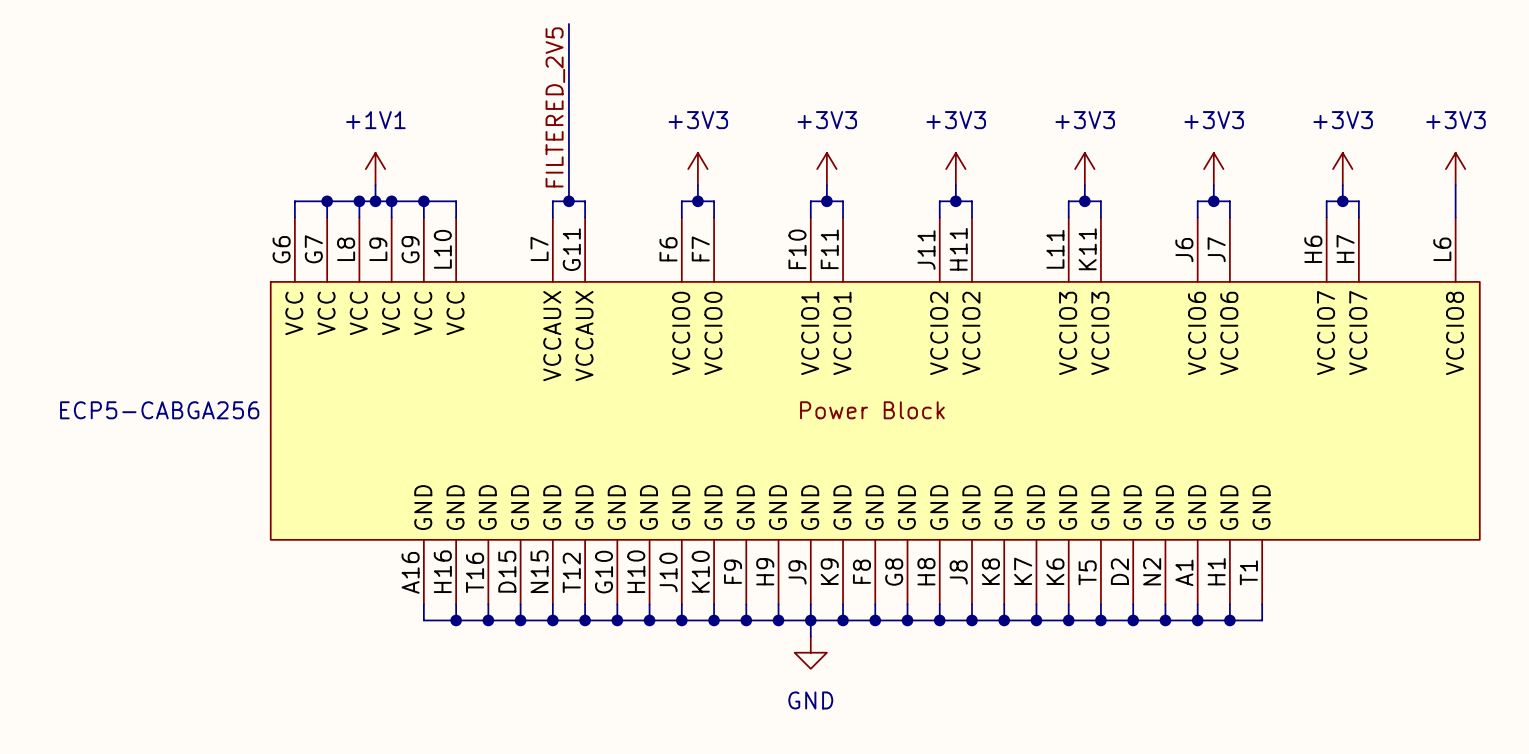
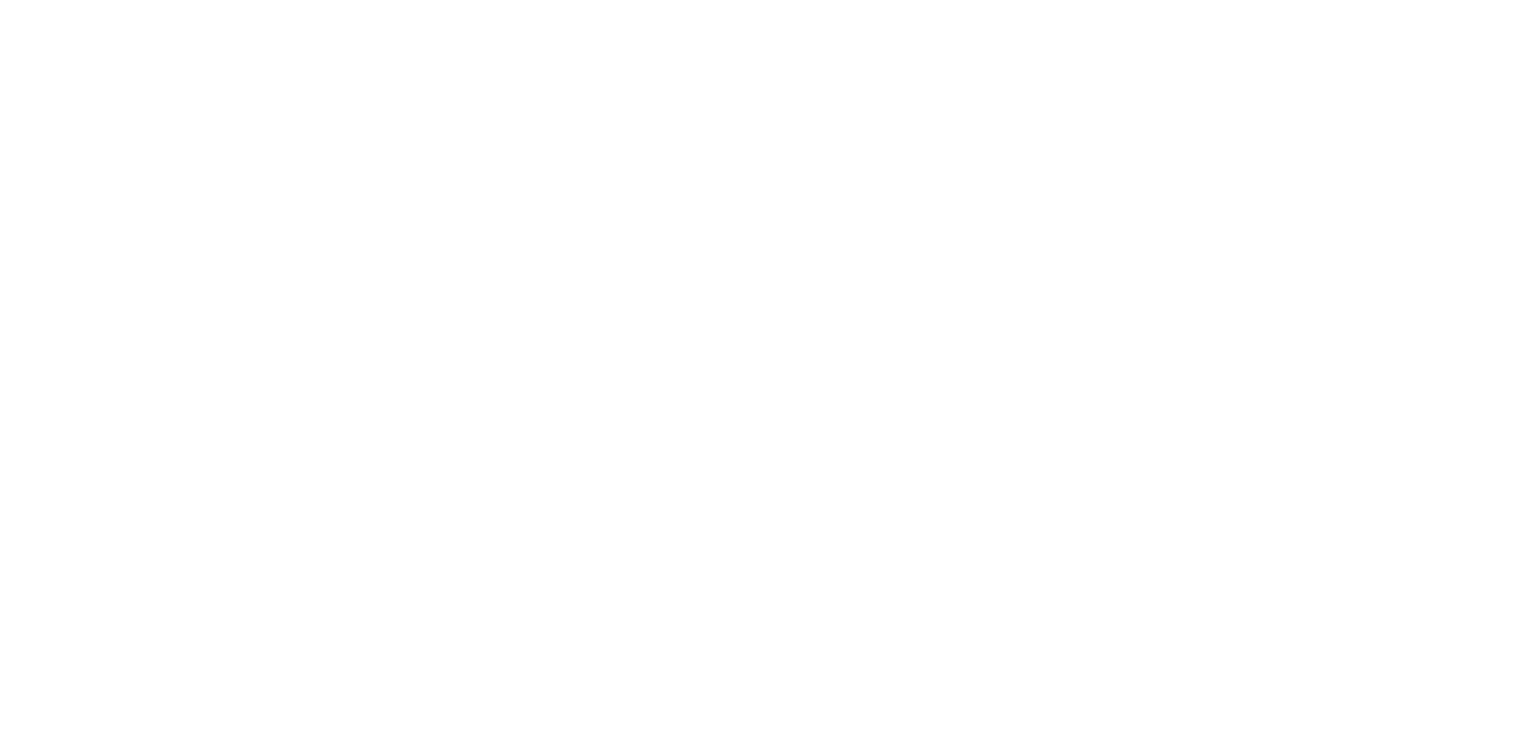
wire: (568, 23) (568, 201) -> none
label: FILTERED_2V5 (555, 107) -> none
power symbol: +1V1 (375, 169) -> none
power symbol: +3V3 (697, 169) -> none
power symbol: +3V3 (826, 169) -> none
power symbol: +3V3 (955, 169) -> none
power symbol: +3V3 (1084, 169) -> none
power symbol: +3V3 (1213, 169) -> none
power symbol: +3V3 (1342, 169) -> none
power symbol: +3V3 (1455, 169) -> none
wire: (375, 185) (375, 201) -> none
wire: (697, 185) (697, 201) -> none
wire: (826, 185) (826, 201) -> none
wire: (955, 185) (955, 201) -> none
wire: (1084, 185) (1084, 201) -> none
wire: (1213, 185) (1213, 201) -> none
wire: (1342, 185) (1342, 201) -> none
wire: (1455, 185) (1455, 217) -> none
wire: (327, 201) (327, 217) -> none
junction: (327, 201) -> none
wire: (359, 201) (359, 217) -> none
junction: (359, 201) -> none
junction: (375, 201) -> none
wire: (391, 201) (391, 217) -> none
junction: (391, 201) -> none
wire: (423, 201) (423, 217) -> none
junction: (423, 201) -> none
junction: (568, 201) -> none
junction: (697, 201) -> none
junction: (826, 201) -> none
junction: (955, 201) -> none
junction: (1084, 201) -> none
junction: (1213, 201) -> none
junction: (1342, 201) -> none
wire: (294, 217) (294, 201) (456, 201) (456, 217) -> none
wire: (552, 217) (552, 201) (585, 201) (585, 217) -> none
wire: (681, 217) (681, 201) (714, 201) (714, 217) -> none
wire: (810, 217) (810, 201) (843, 201) (843, 217) -> none
wire: (939, 217) (939, 201) (971, 201) (971, 217) -> none
wire: (1068, 217) (1068, 201) (1100, 201) (1100, 217) -> none
wire: (1197, 217) (1197, 201) (1229, 201) (1229, 217) -> none
wire: (1326, 217) (1326, 201) (1358, 201) (1358, 217) -> none
part: ECP5-CABGA256 (875, 410) -> none
wire: (423, 604) (423, 620) (1262, 620) (1262, 604) -> none
wire: (456, 604) (456, 620) -> none
wire: (488, 604) (488, 620) -> none
wire: (520, 604) (520, 620) -> none
wire: (552, 604) (552, 620) -> none
wire: (585, 604) (585, 620) -> none
wire: (617, 604) (617, 620) -> none
wire: (649, 604) (649, 620) -> none
wire: (681, 604) (681, 620) -> none
wire: (714, 604) (714, 620) -> none
wire: (746, 604) (746, 620) -> none
wire: (778, 604) (778, 620) -> none
wire: (810, 604) (810, 636) -> none
wire: (843, 604) (843, 620) -> none
wire: (875, 604) (875, 620) -> none
wire: (907, 604) (907, 620) -> none
wire: (939, 604) (939, 620) -> none
wire: (971, 604) (971, 620) -> none
wire: (1004, 604) (1004, 620) -> none
wire: (1036, 604) (1036, 620) -> none
wire: (1068, 604) (1068, 620) -> none
wire: (1100, 604) (1100, 620) -> none
wire: (1133, 604) (1133, 620) -> none
wire: (1165, 604) (1165, 620) -> none
wire: (1197, 604) (1197, 620) -> none
wire: (1229, 604) (1229, 620) -> none
junction: (456, 620) -> none
junction: (488, 620) -> none
junction: (520, 620) -> none
junction: (552, 620) -> none
junction: (585, 620) -> none
junction: (617, 620) -> none
junction: (649, 620) -> none
junction: (681, 620) -> none
junction: (714, 620) -> none
junction: (746, 620) -> none
junction: (778, 620) -> none
junction: (810, 620) -> none
junction: (843, 620) -> none
junction: (875, 620) -> none
junction: (907, 620) -> none
junction: (939, 620) -> none
junction: (971, 620) -> none
junction: (1004, 620) -> none
junction: (1036, 620) -> none
junction: (1068, 620) -> none
junction: (1100, 620) -> none
junction: (1133, 620) -> none
junction: (1165, 620) -> none
junction: (1197, 620) -> none
junction: (1229, 620) -> none
power symbol: GND (810, 652) -> none

